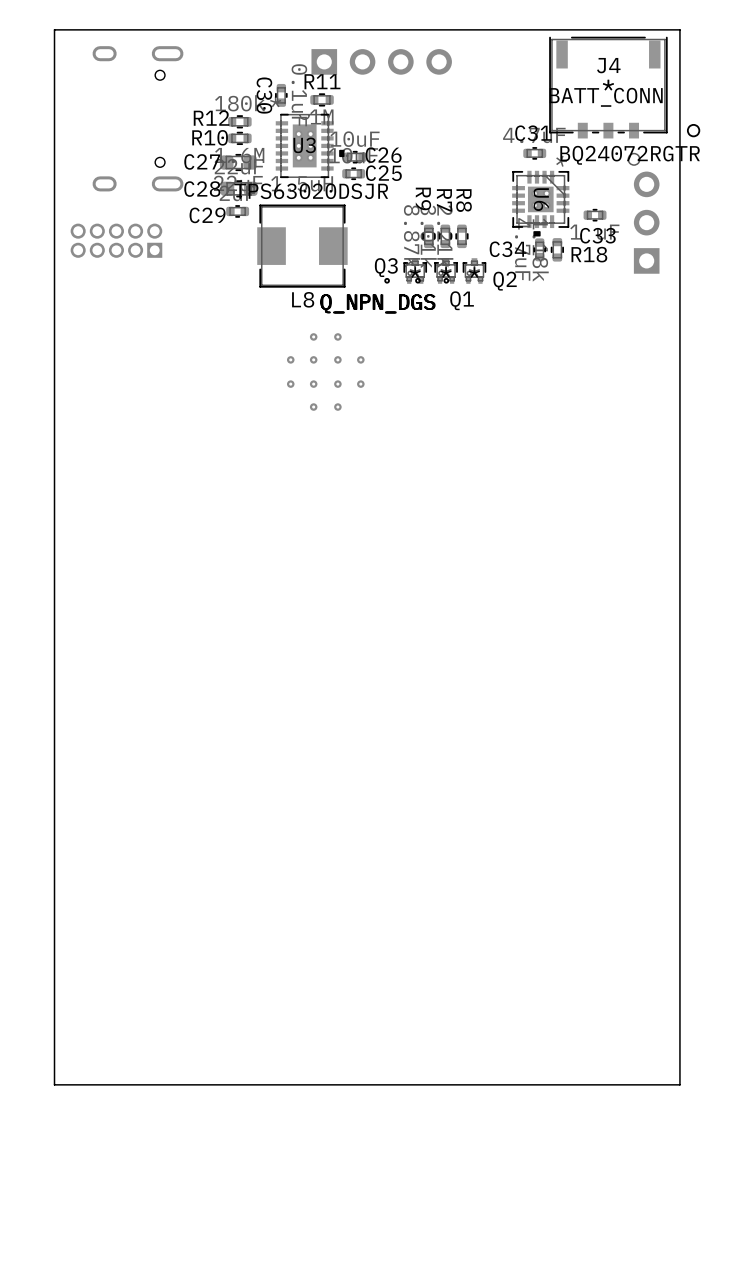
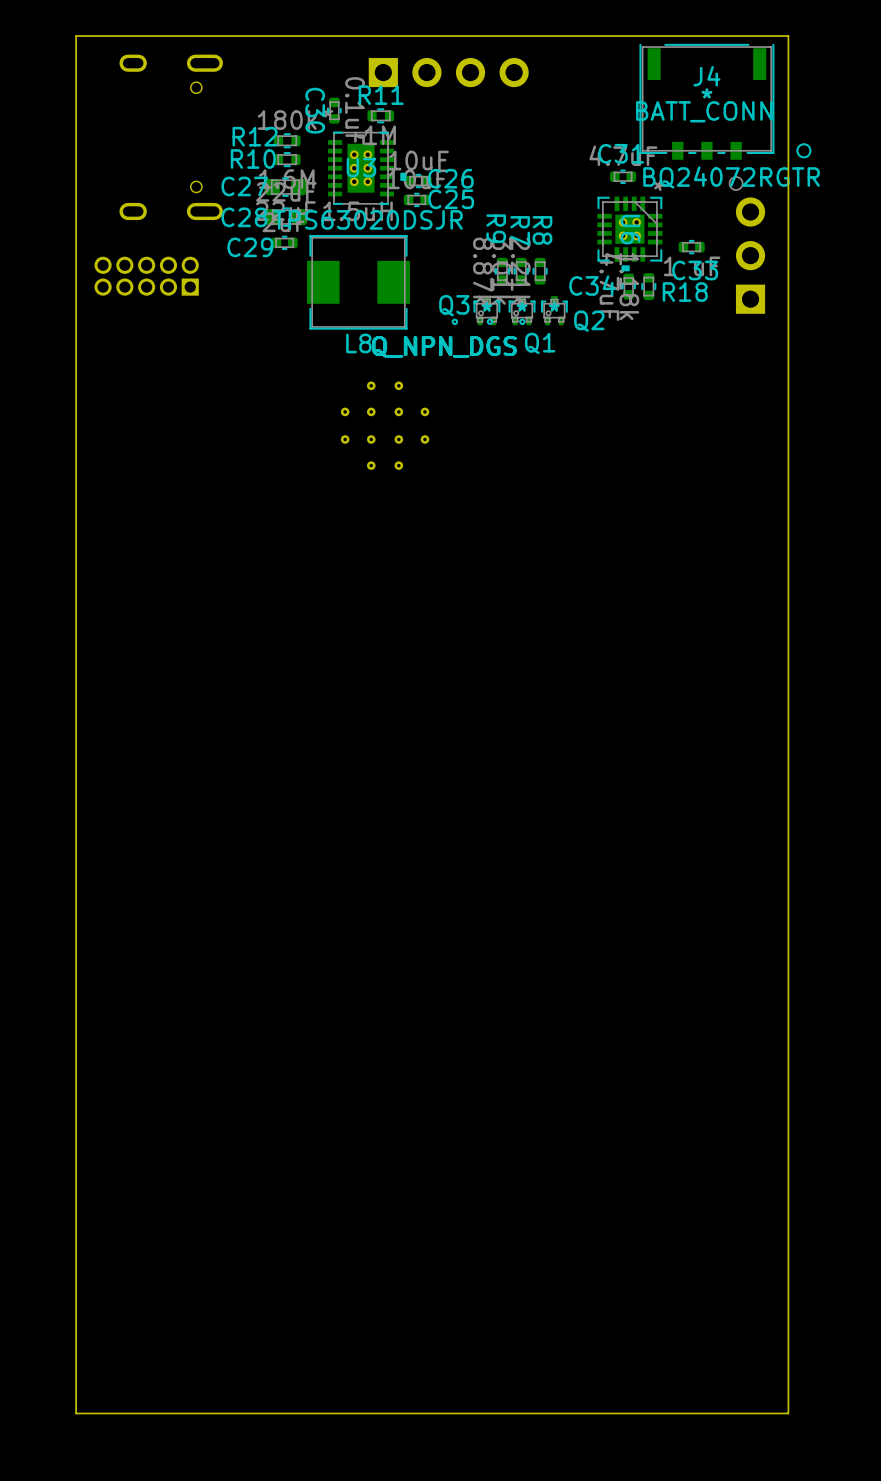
board edge: (679, 1084) (54, 1084) -> (788, 1237) (788, 1413) (76, 1413) (76, 1237)

